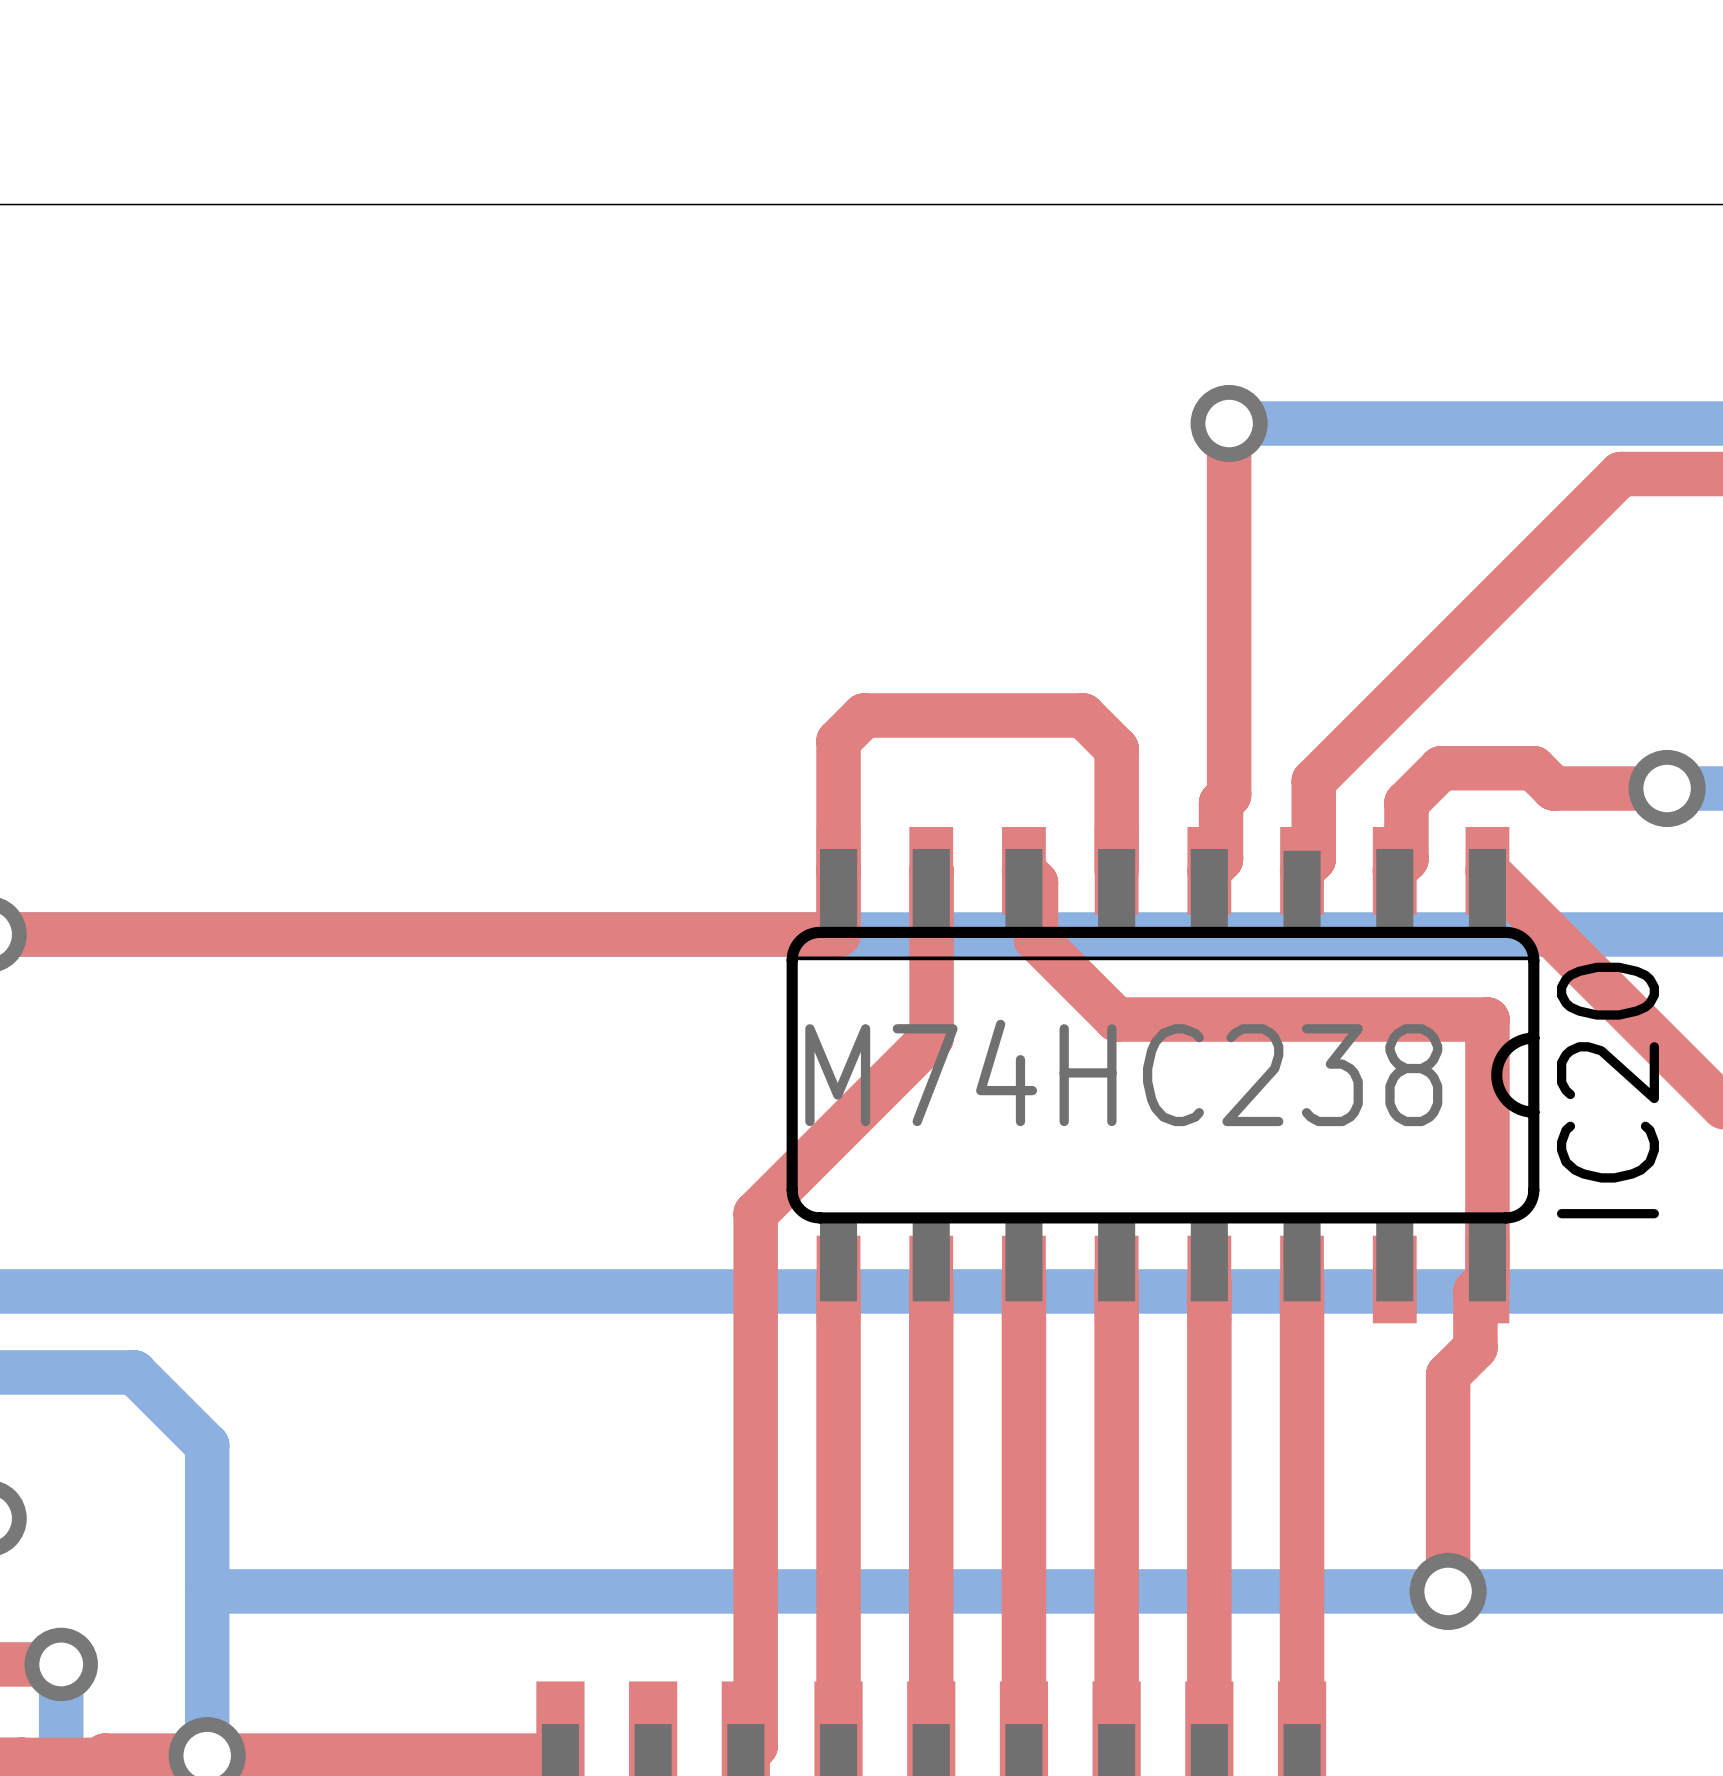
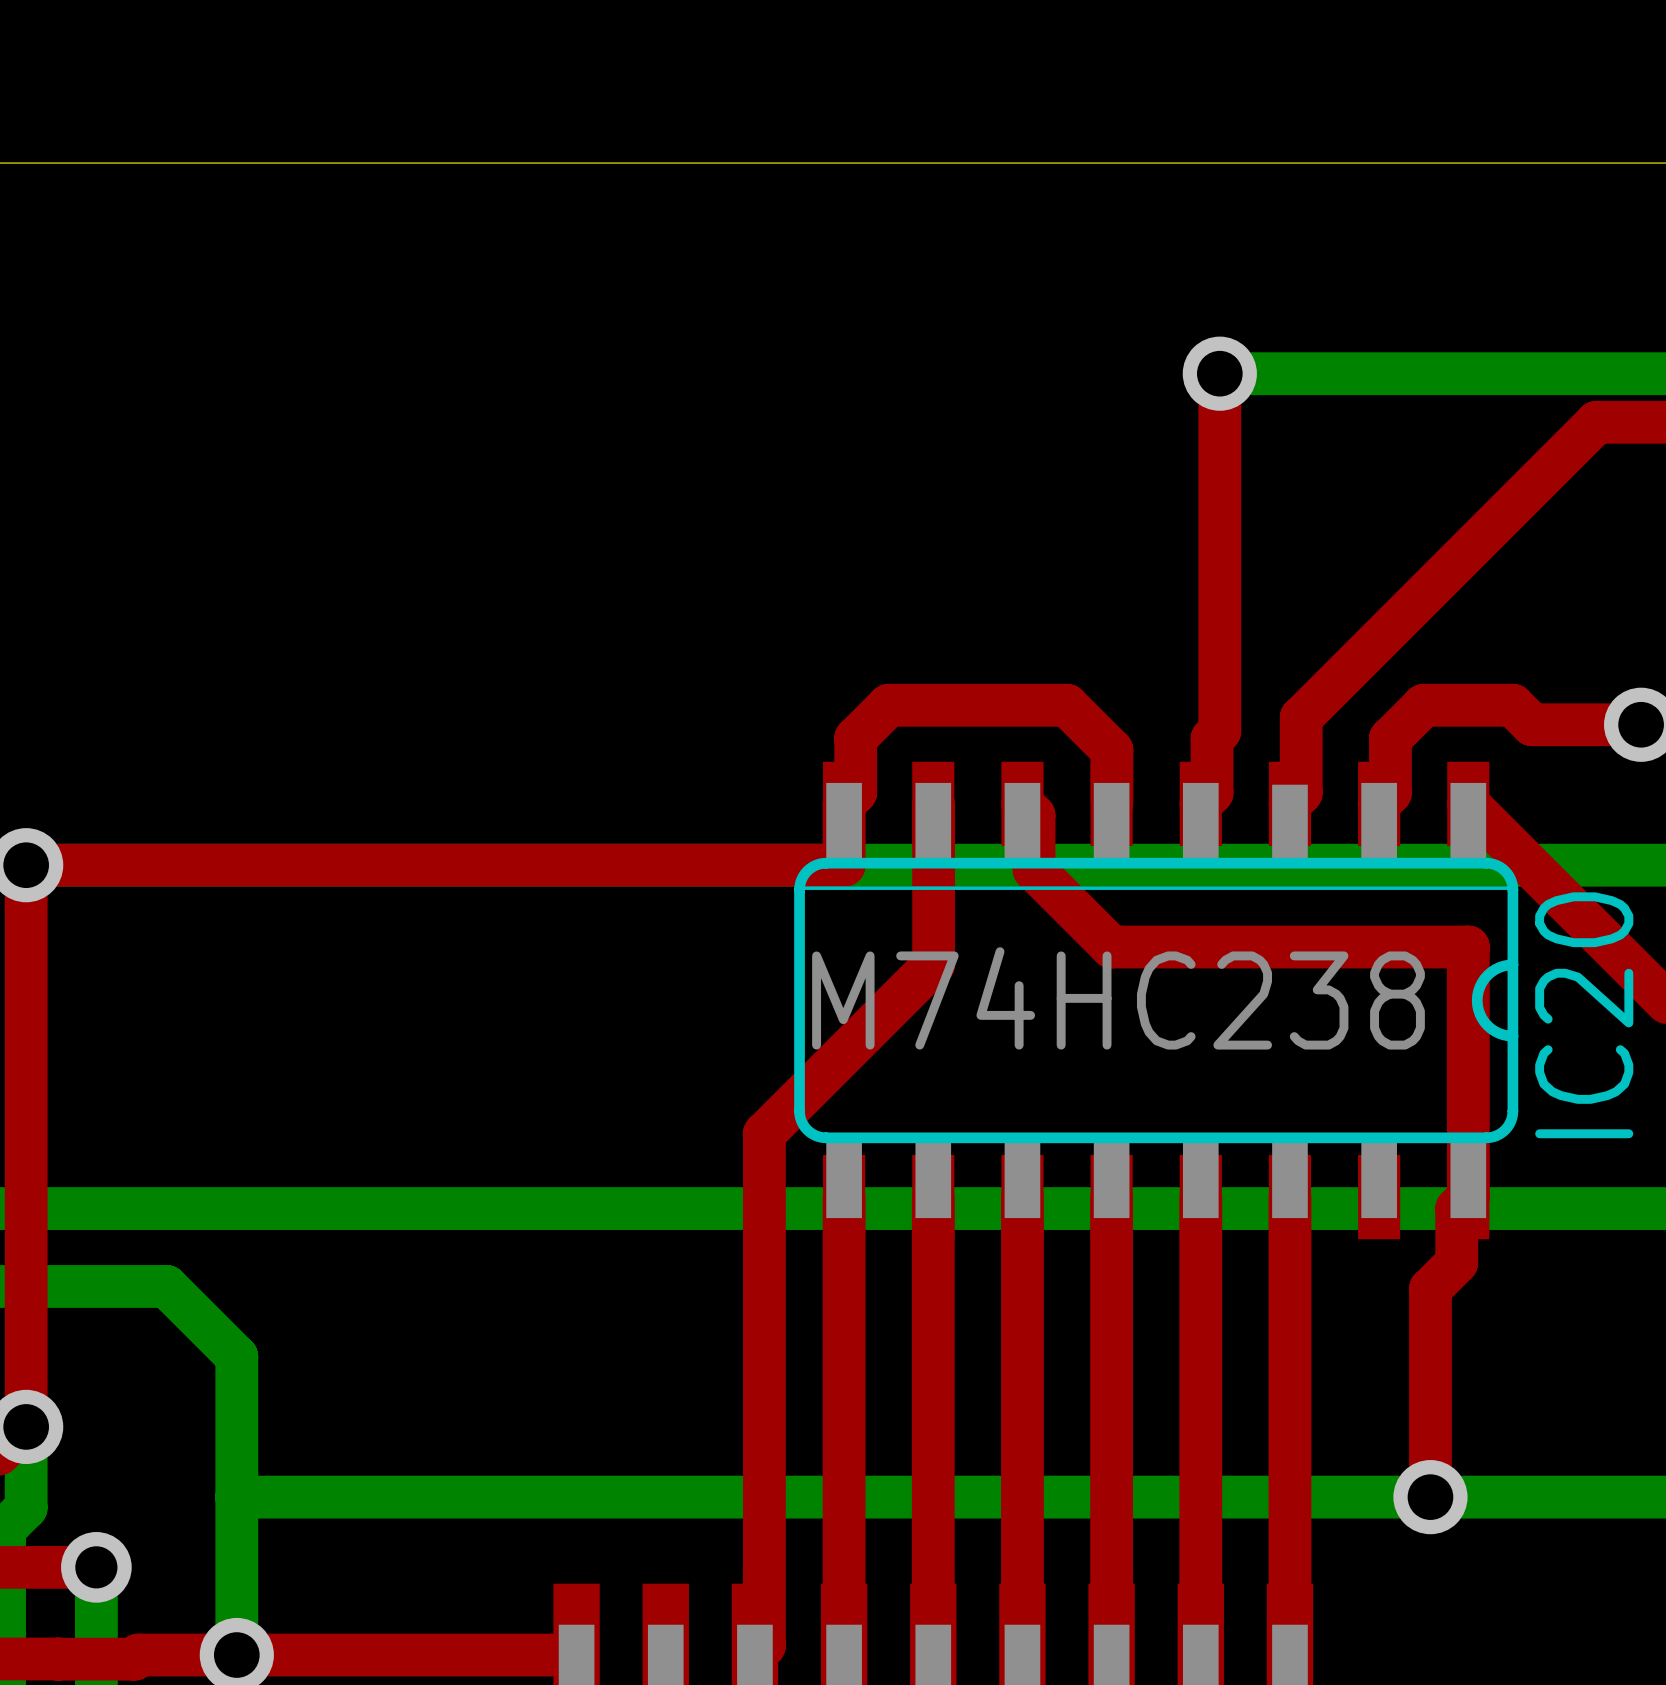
top track: (1116, 815) (1116, 749) (1083, 715) (864, 715) (838, 741) (838, 870) -> (1111, 750) (1066, 705) (888, 705) (855, 738) (855, 792) (844, 803)

